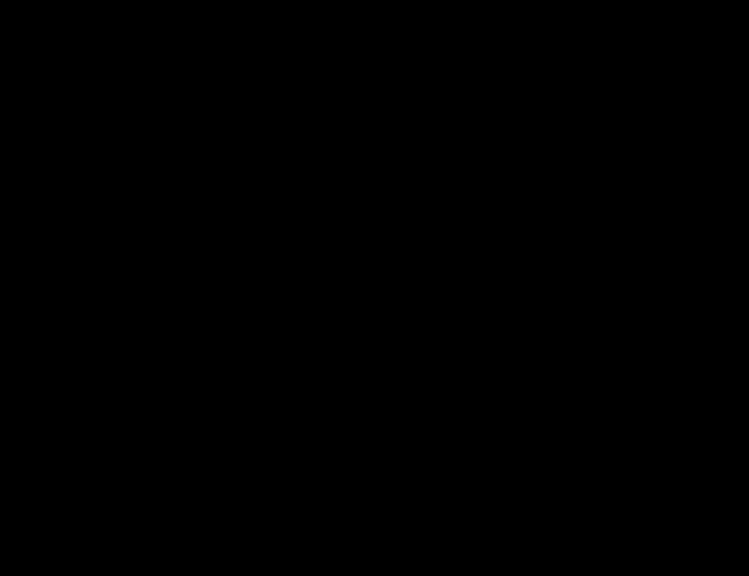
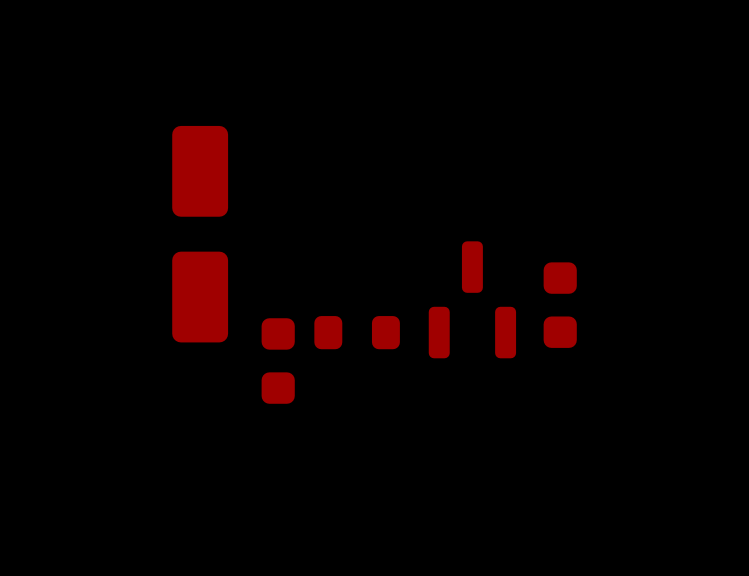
part: none -> (200, 234)
part: none -> (472, 299)
part: none -> (560, 305)
part: none -> (357, 332)
part: none -> (278, 361)

